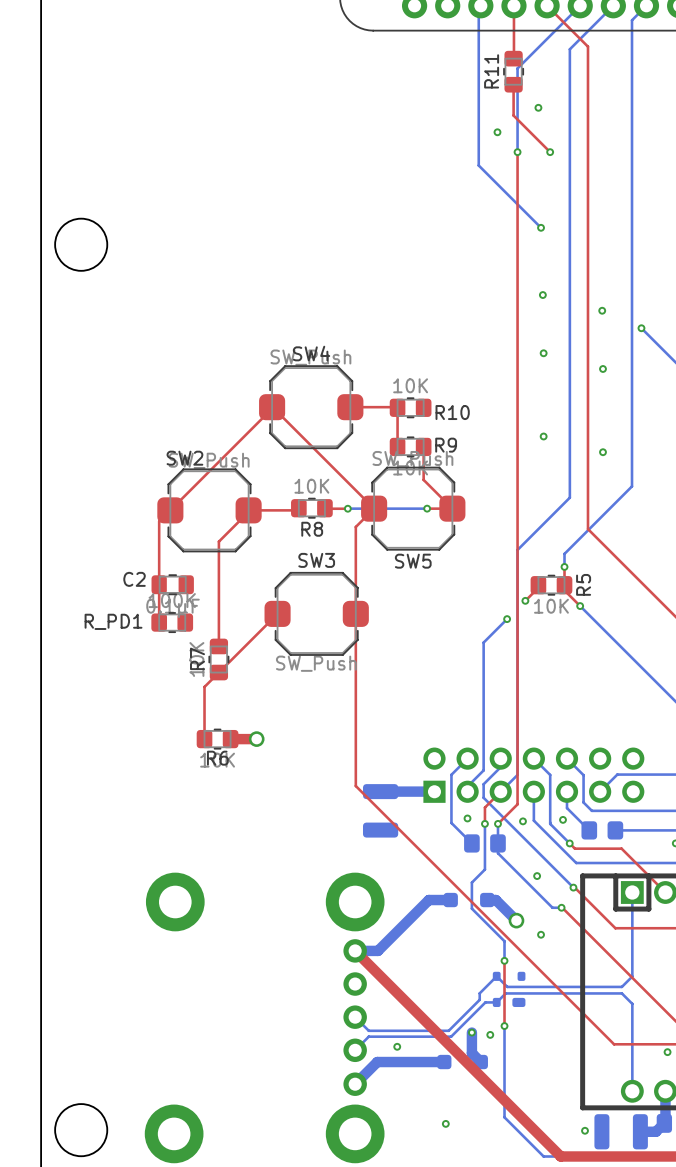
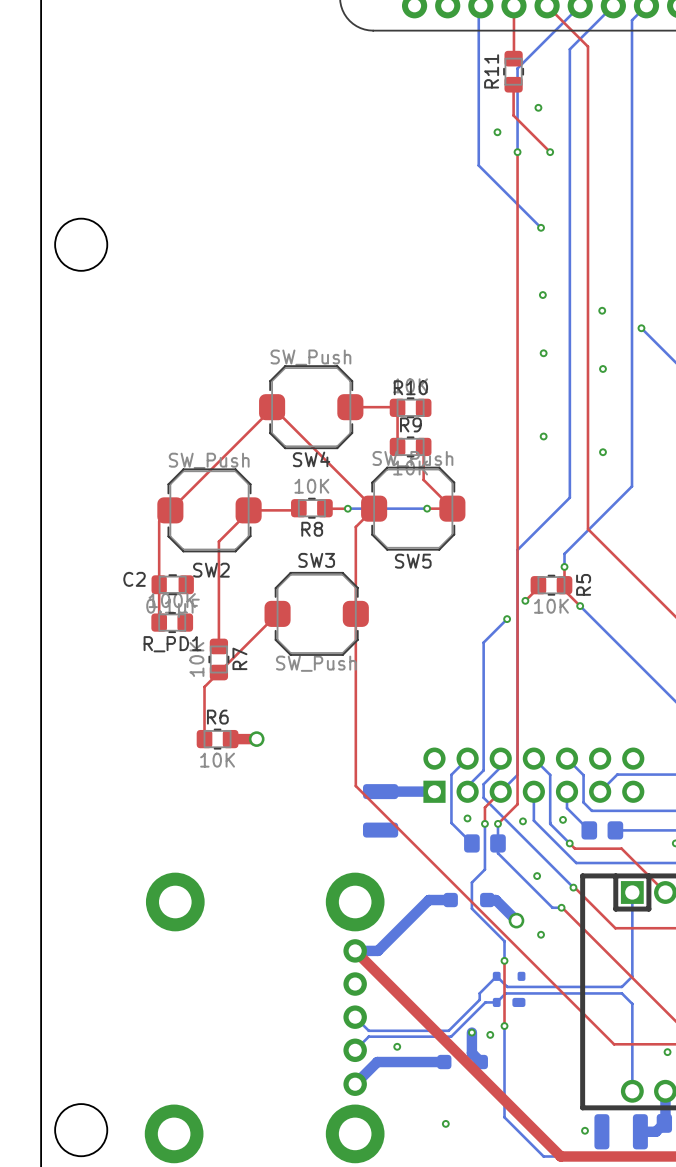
SW4 name position: SW4 (311, 353) -> SW4 (311, 459)
R10 name position: R10 (452, 412) -> R10 (410, 387)
R9 name position: R9 (446, 445) -> R9 (410, 424)
SW2 name position: SW2 (184, 458) -> SW2 (211, 570)
R_PD1 name position: R_PD1 (113, 621) -> R_PD1 (172, 644)
R7 name position: R7 (197, 658) -> R7 (239, 658)
R6 name position: R6 (217, 758) -> R6 (217, 717)

